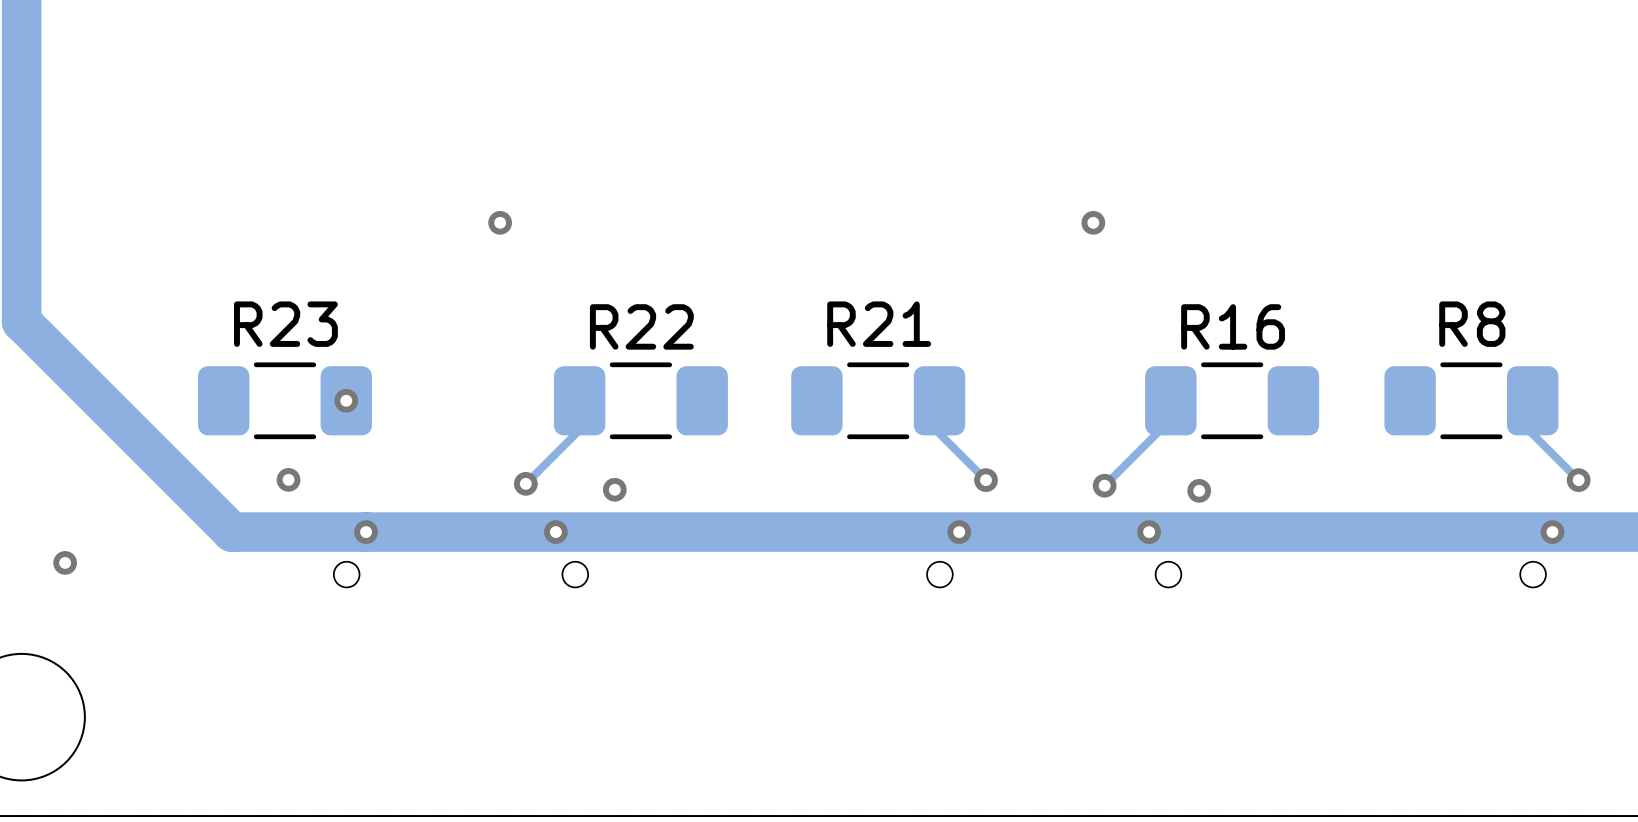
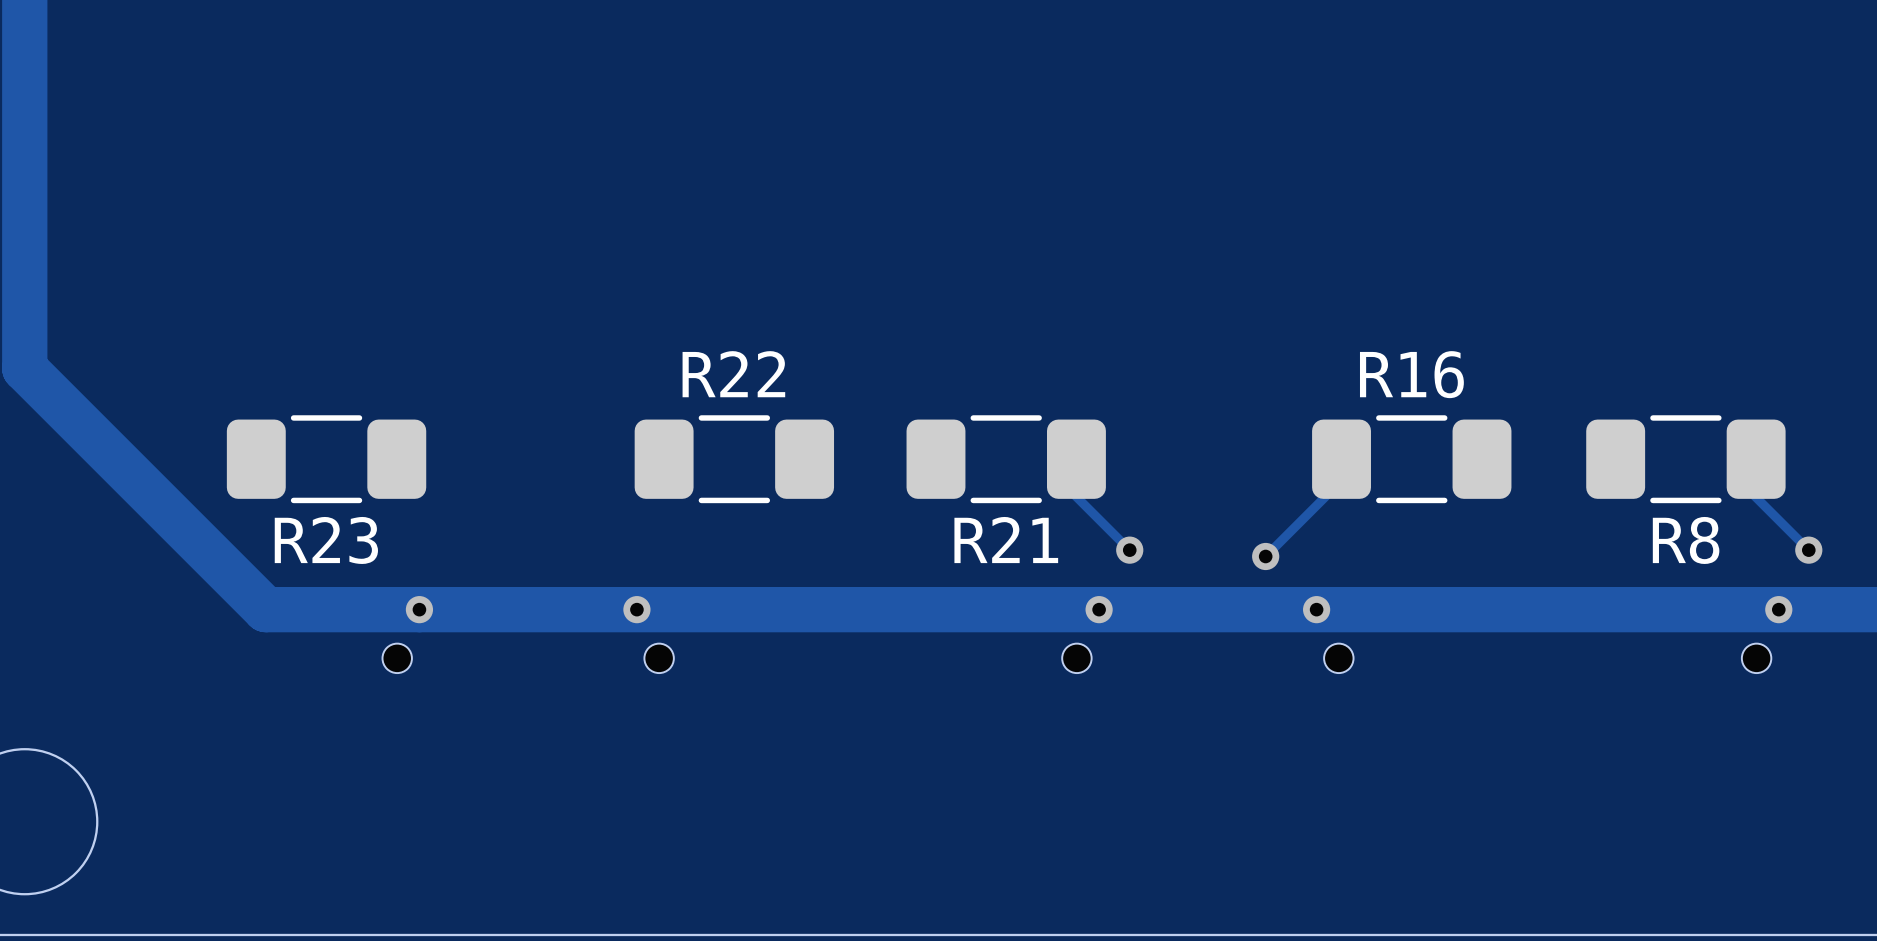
via: (500, 222) -> none
via: (1093, 222) -> none
R23 name position: R23 (285, 324) -> R23 (326, 540)
R21 name position: R21 (879, 324) -> R21 (1006, 540)
R8 name position: R8 (1472, 324) -> R8 (1686, 540)
via: (346, 400) -> none
track: (579, 400) (579, 430) (525, 483) -> none
via: (288, 479) -> none
via: (525, 483) -> none
via: (614, 489) -> none
via: (1199, 490) -> none
via: (65, 562) -> none

